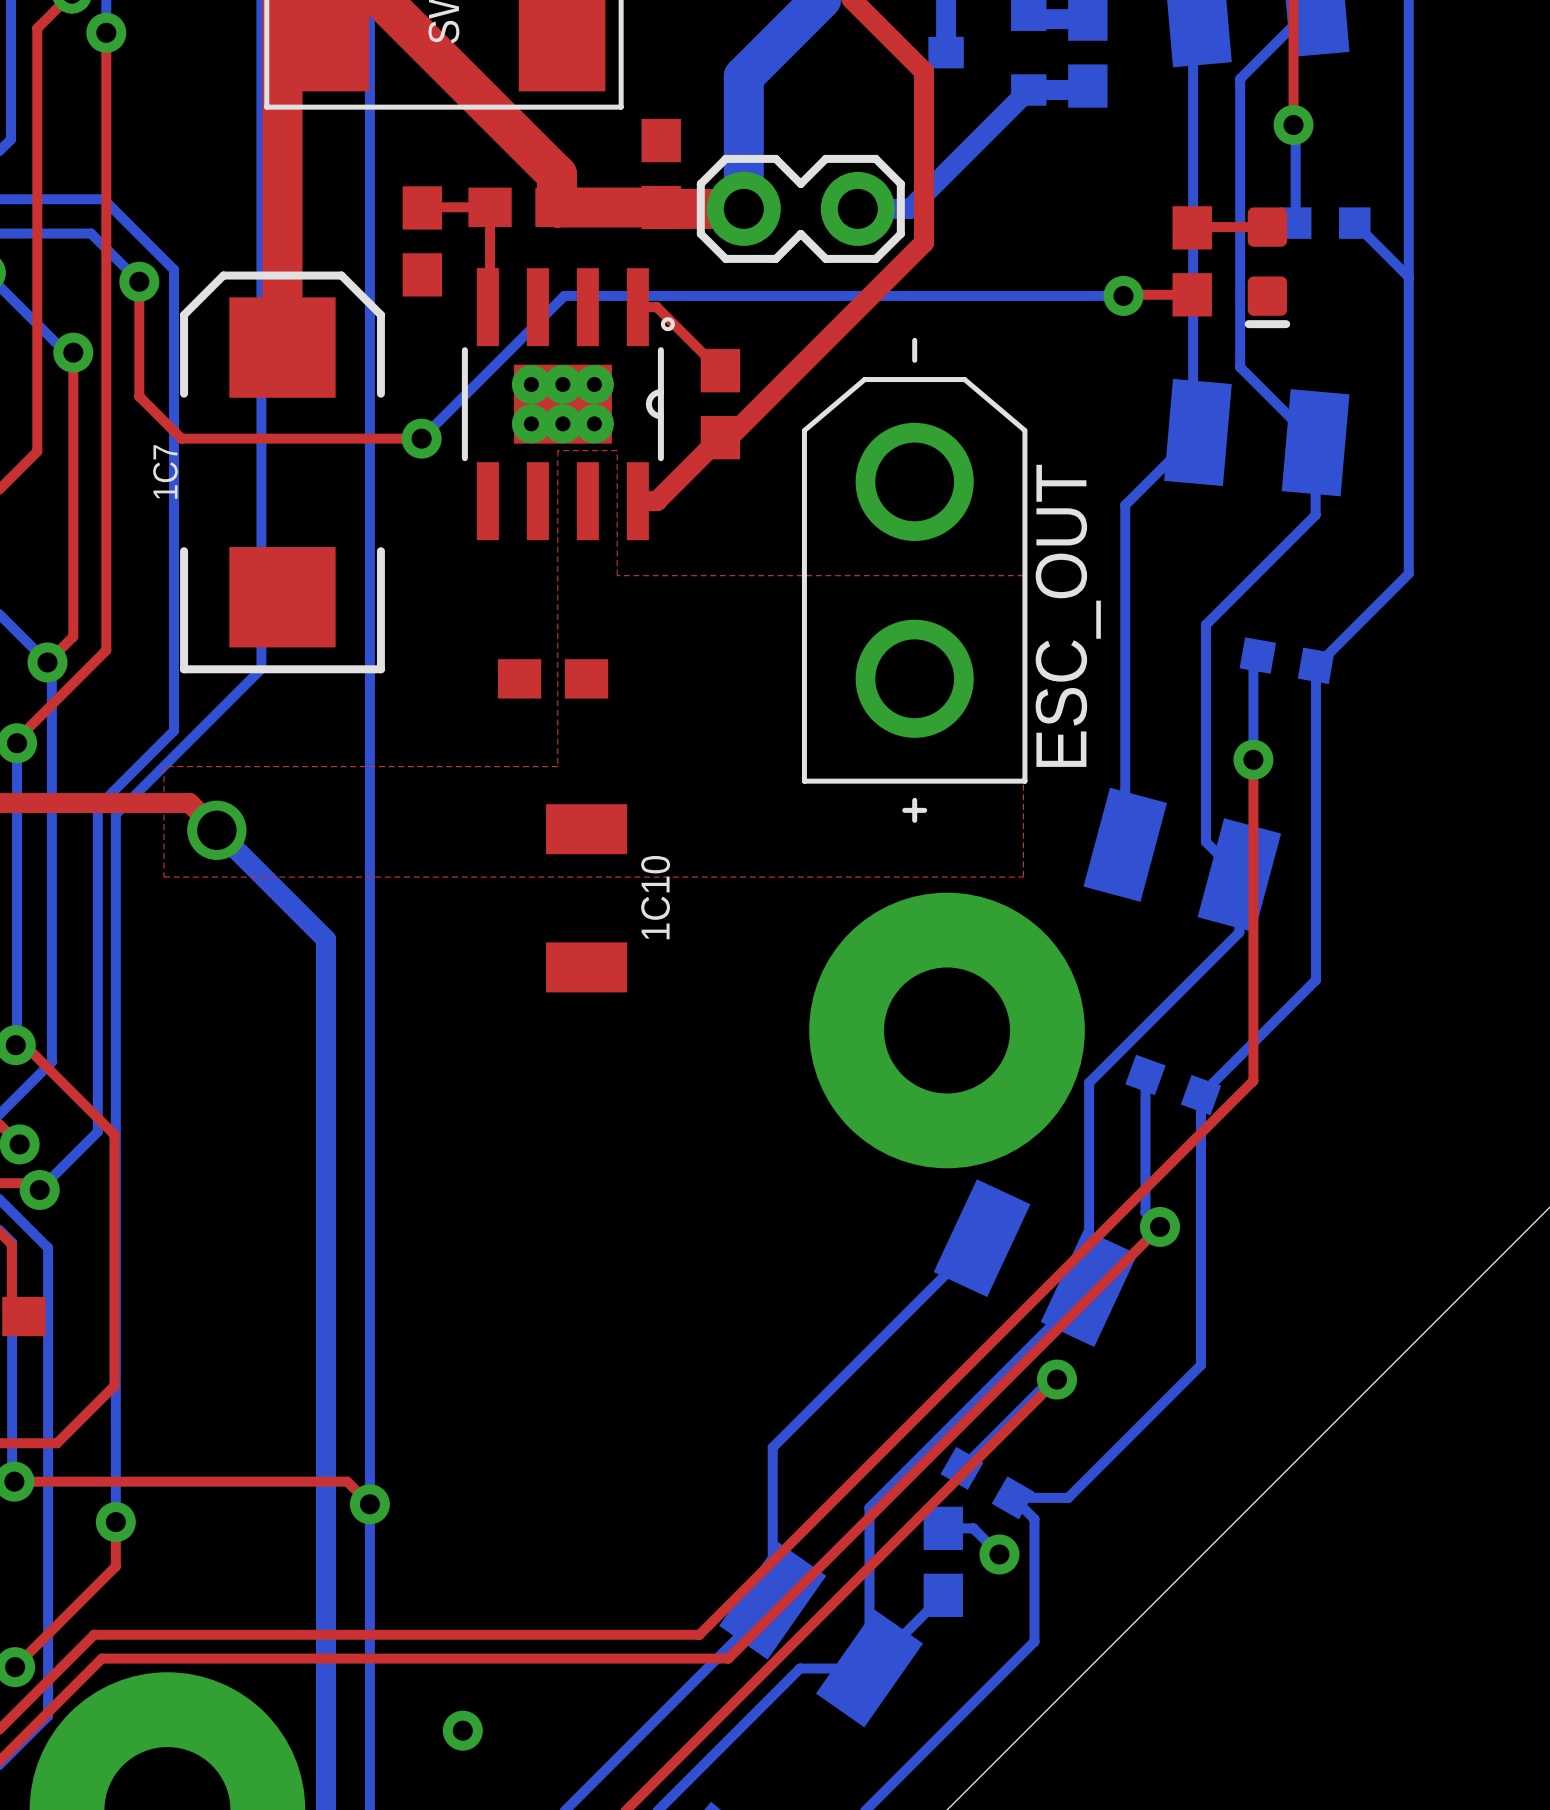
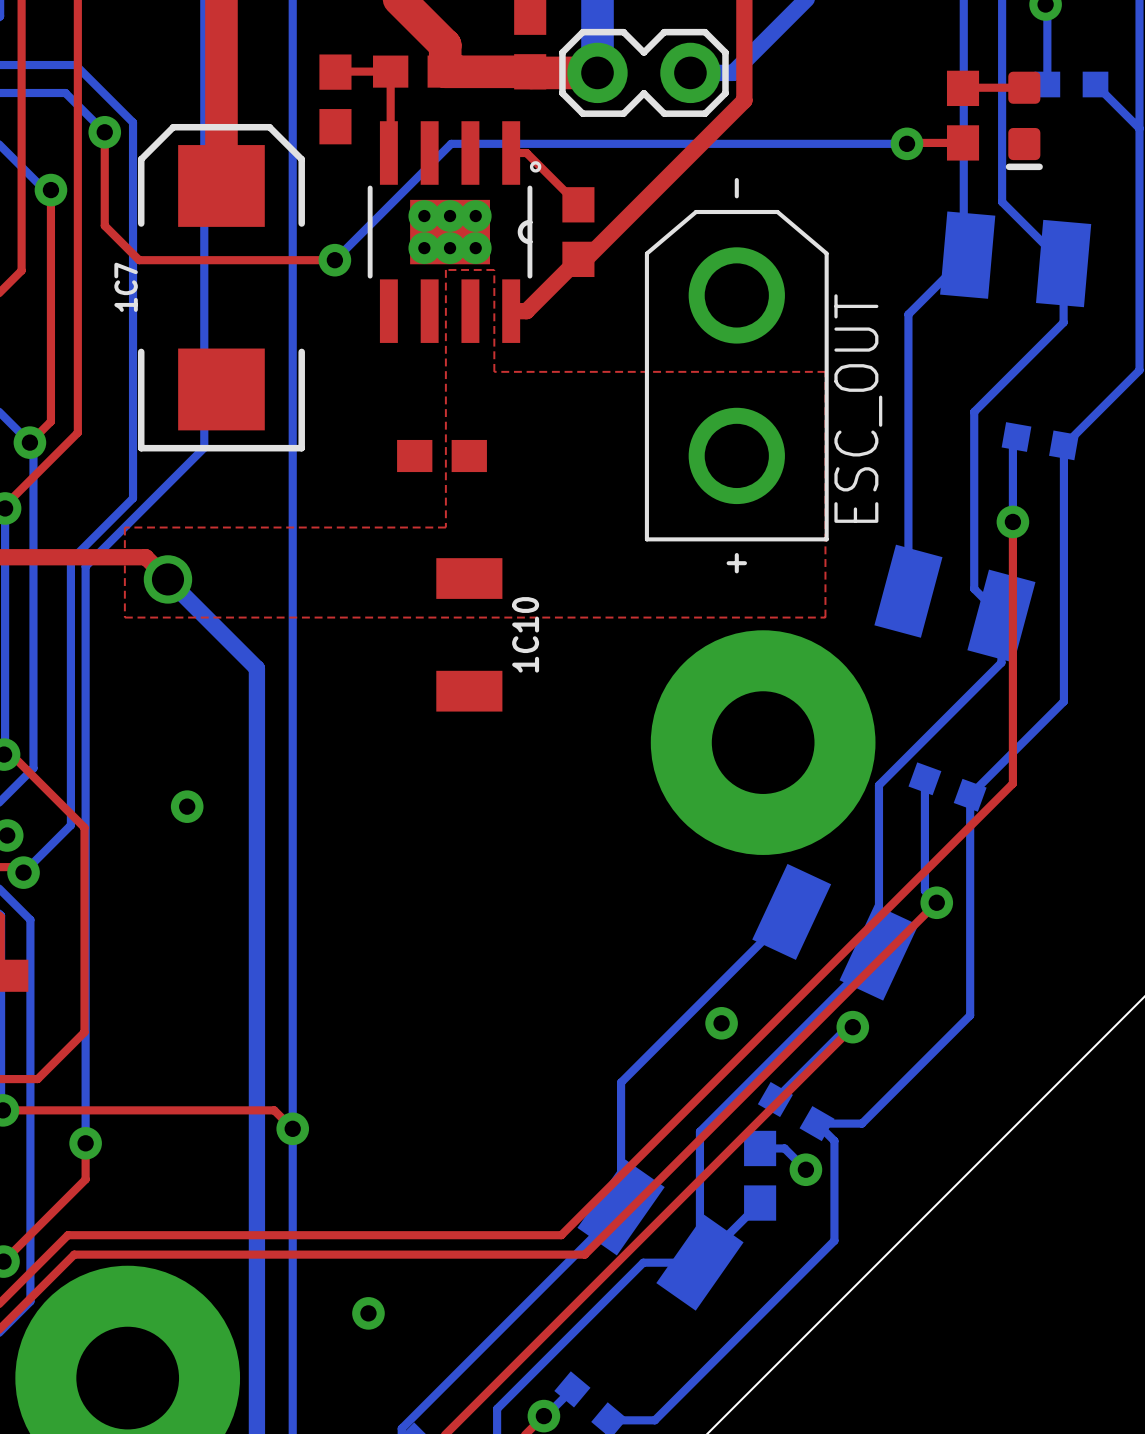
via: none -> (187, 806)
via: none -> (721, 1023)

